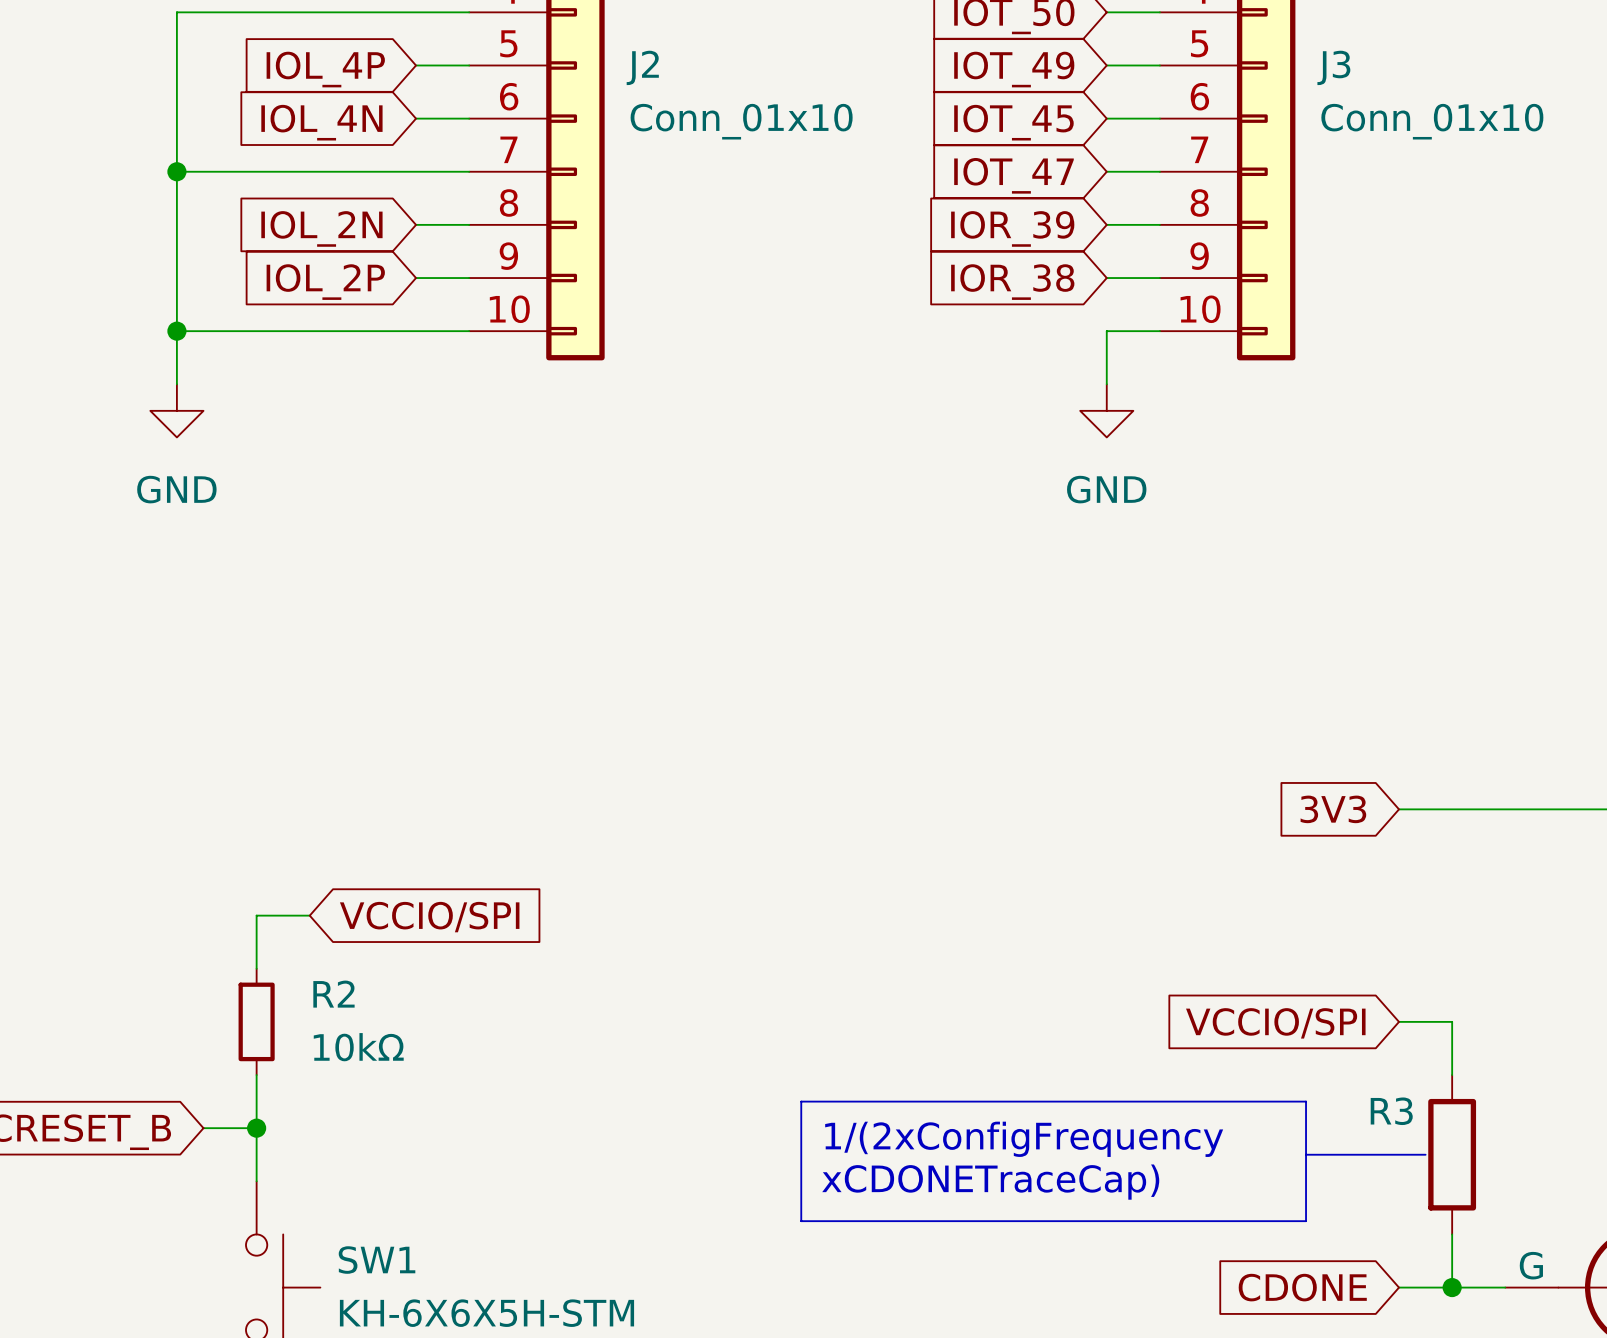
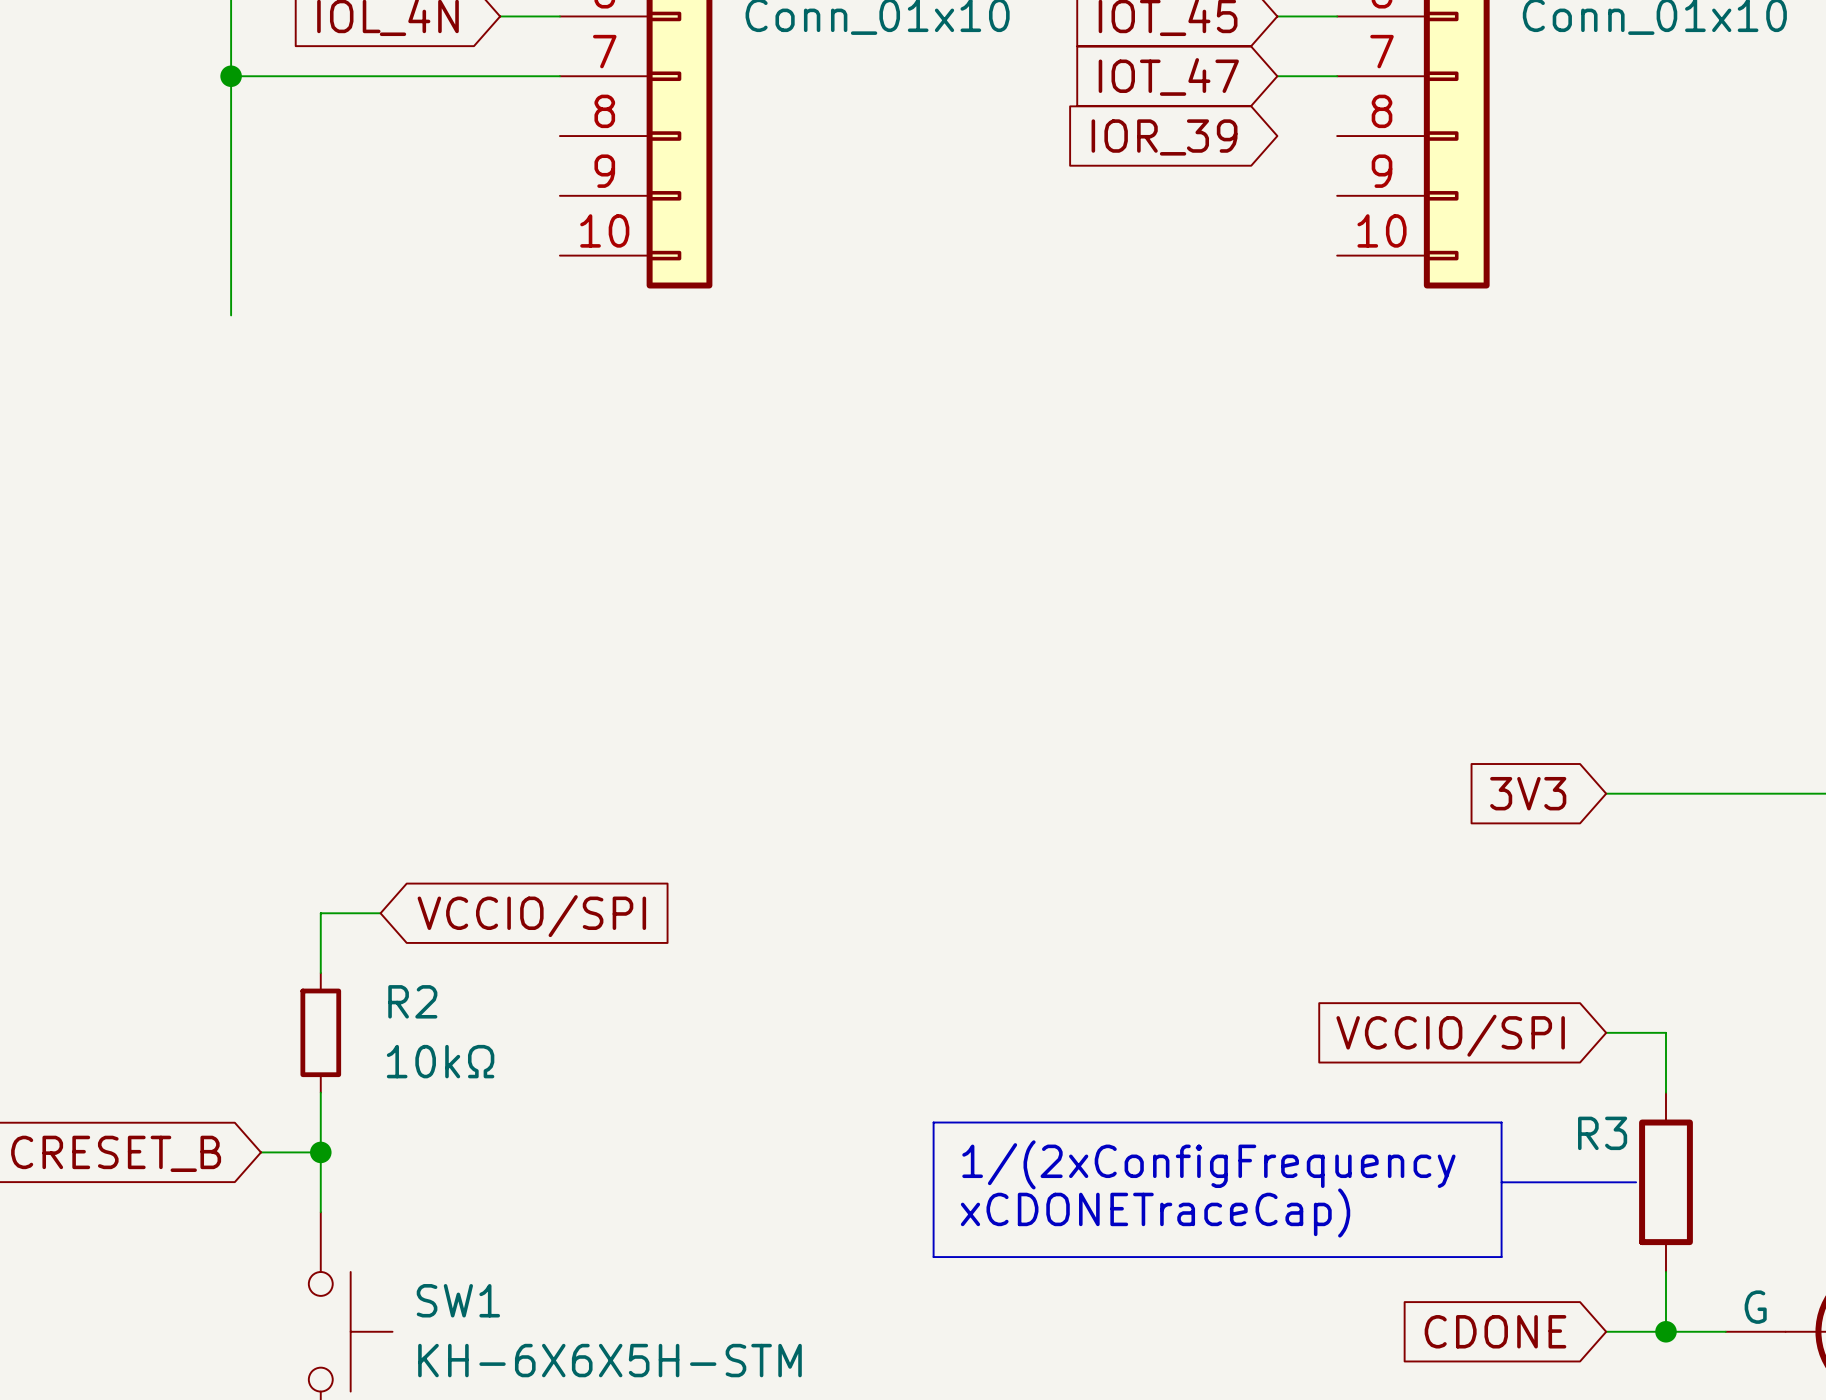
wire: (416, 224) (469, 224) -> none
wire: (1106, 224) (1159, 224) -> none
global label: IOL_2N (321, 228) -> none
wire: (416, 278) (469, 278) -> none
wire: (1106, 278) (1159, 278) -> none
global label: IOL_2P (325, 282) -> none
global label: IOR_38 (1012, 282) -> none
wire: (176, 331) (469, 331) -> none
junction: (176, 331) -> none
wire: (1159, 331) (1106, 331) (1106, 384) -> none
power symbol: GND (176, 410) -> none
power symbol: GND (1106, 410) -> none

